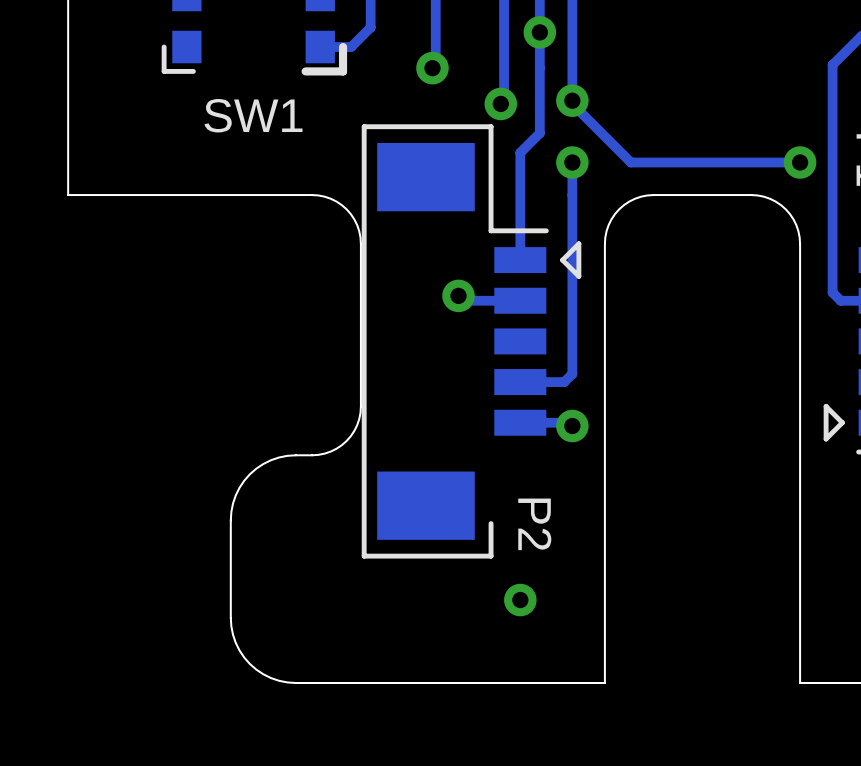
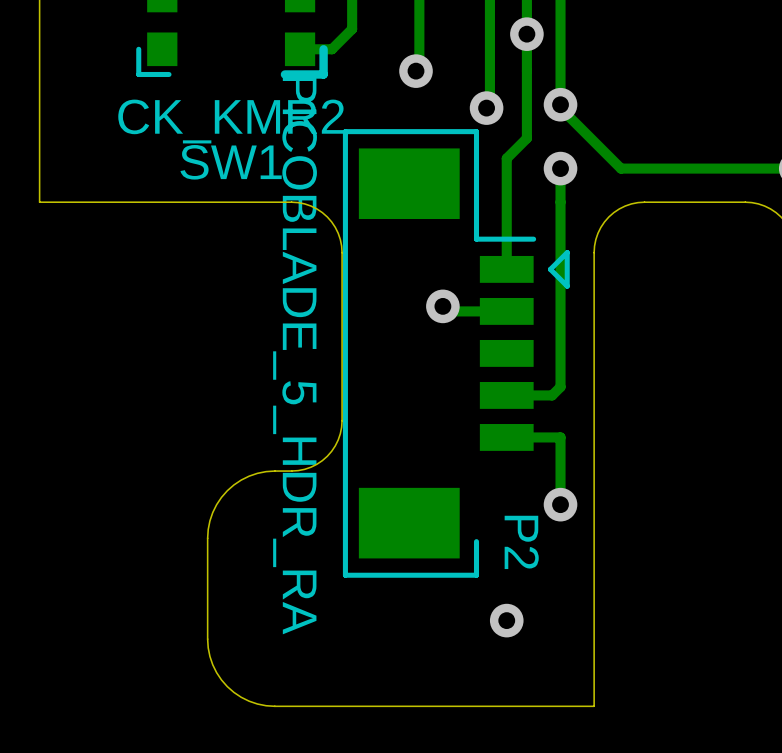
SW1 name position: SW1 (253, 115) -> SW1 (231, 162)
SW1 value: none -> CK_KMR2 (231, 121)
P2 value: none -> PICOBLADE_5_HDR_RA (295, 355)
track: none -> (560, 440) (560, 504)
via position: (572, 426) -> (560, 504)

